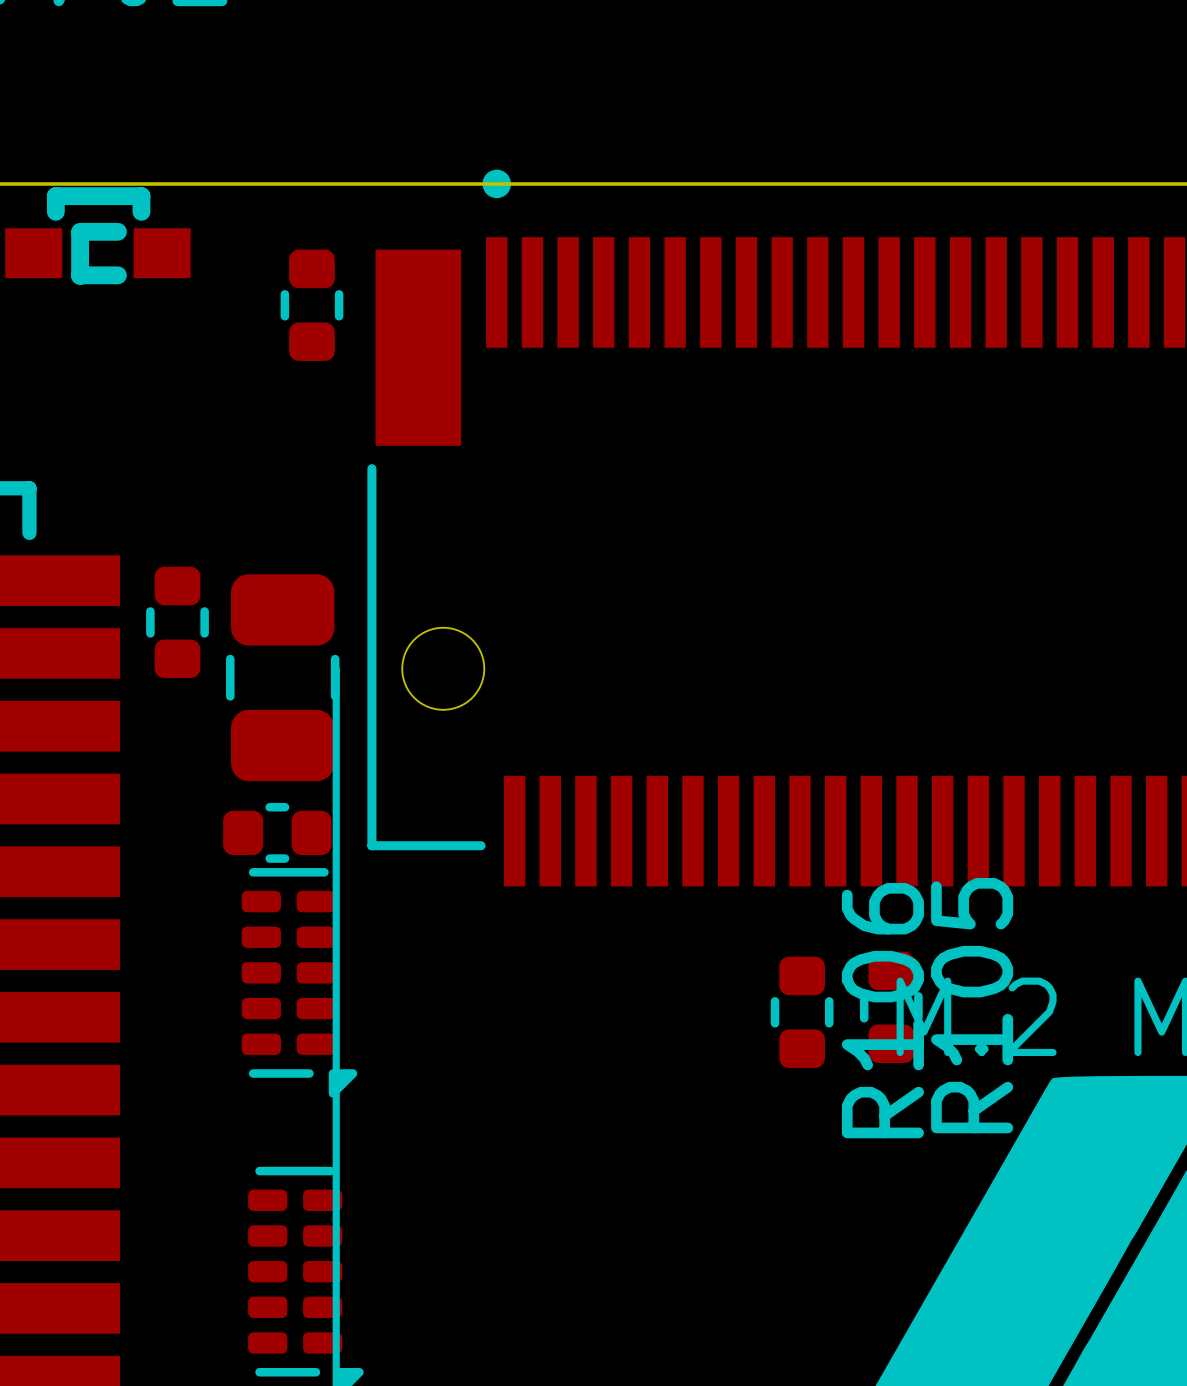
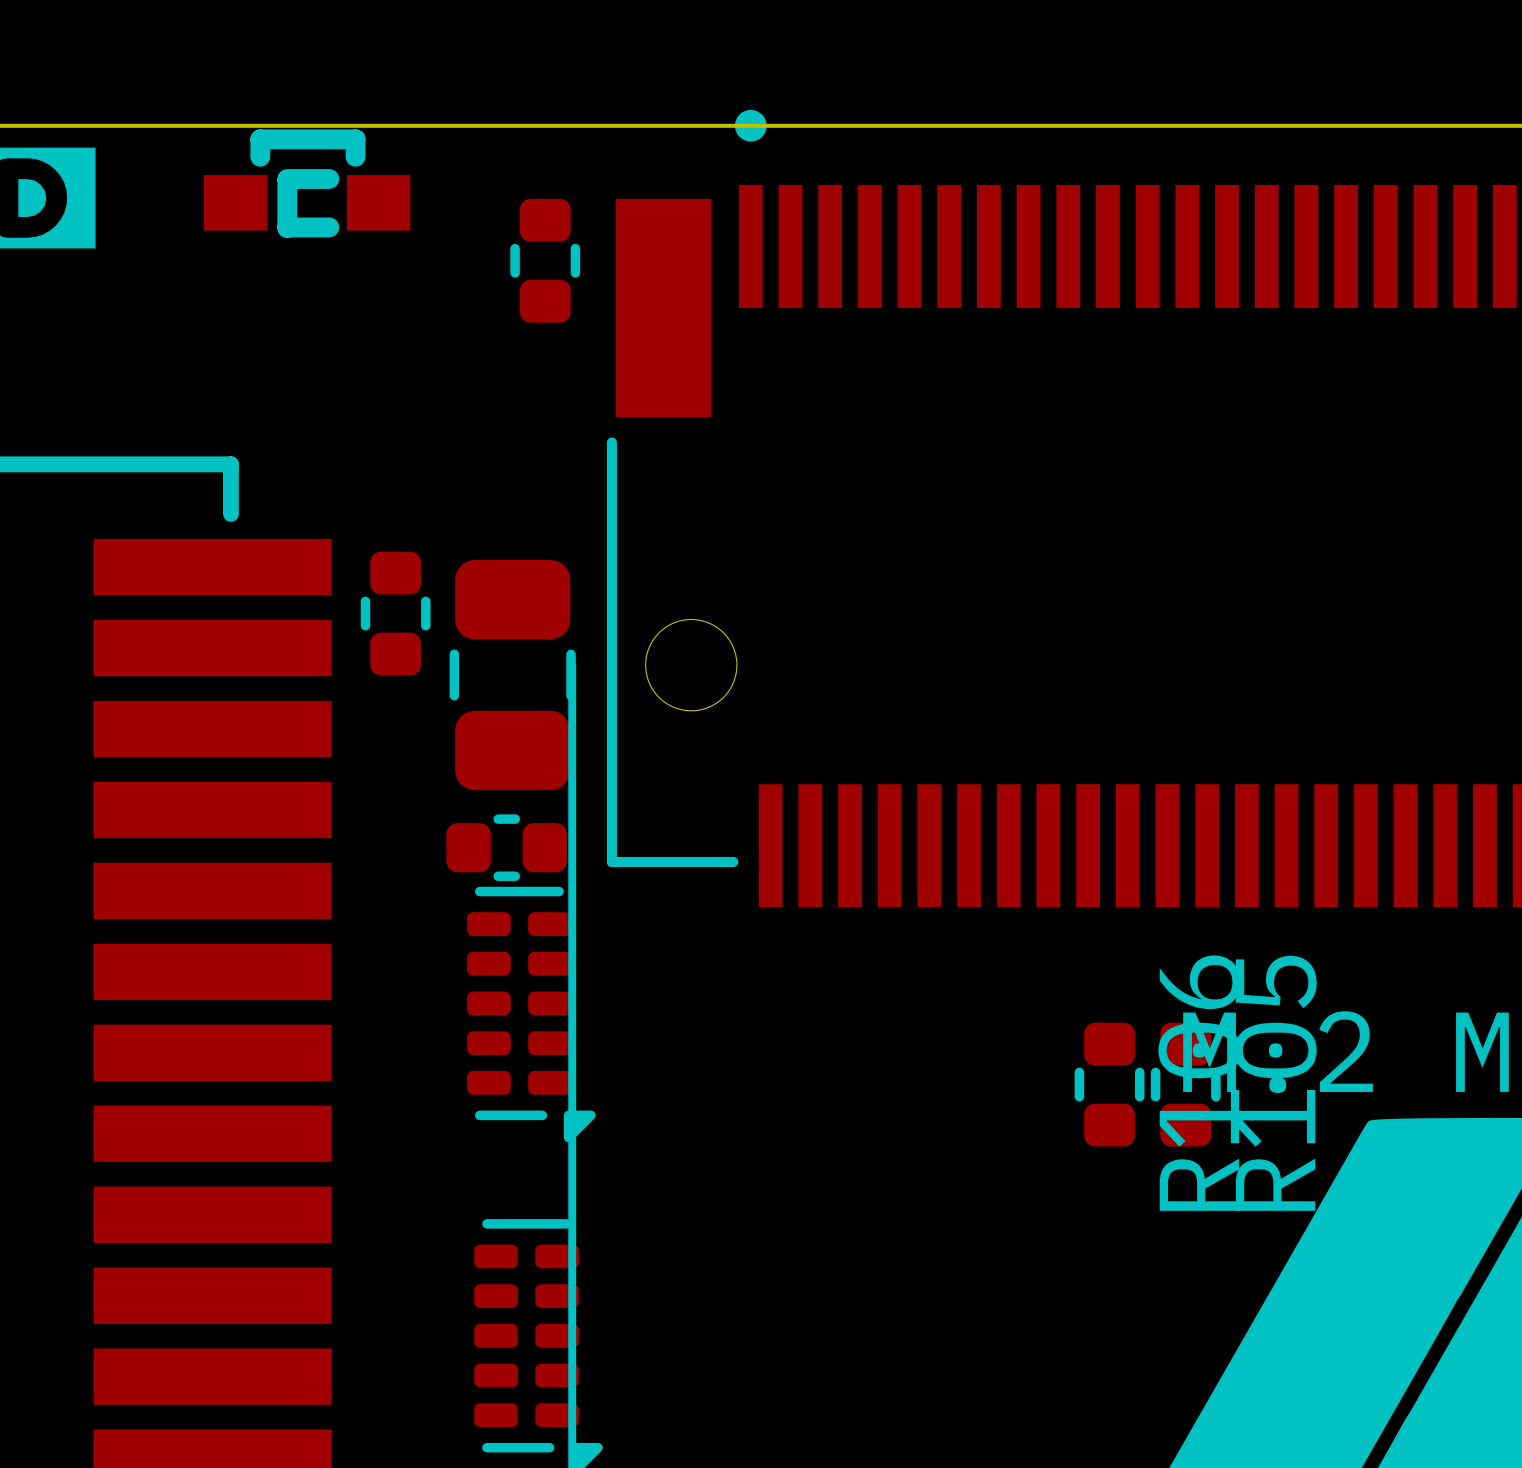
R105 position: (891, 1007) -> (1185, 1084)
R106 position: (802, 1012) -> (1109, 1084)

